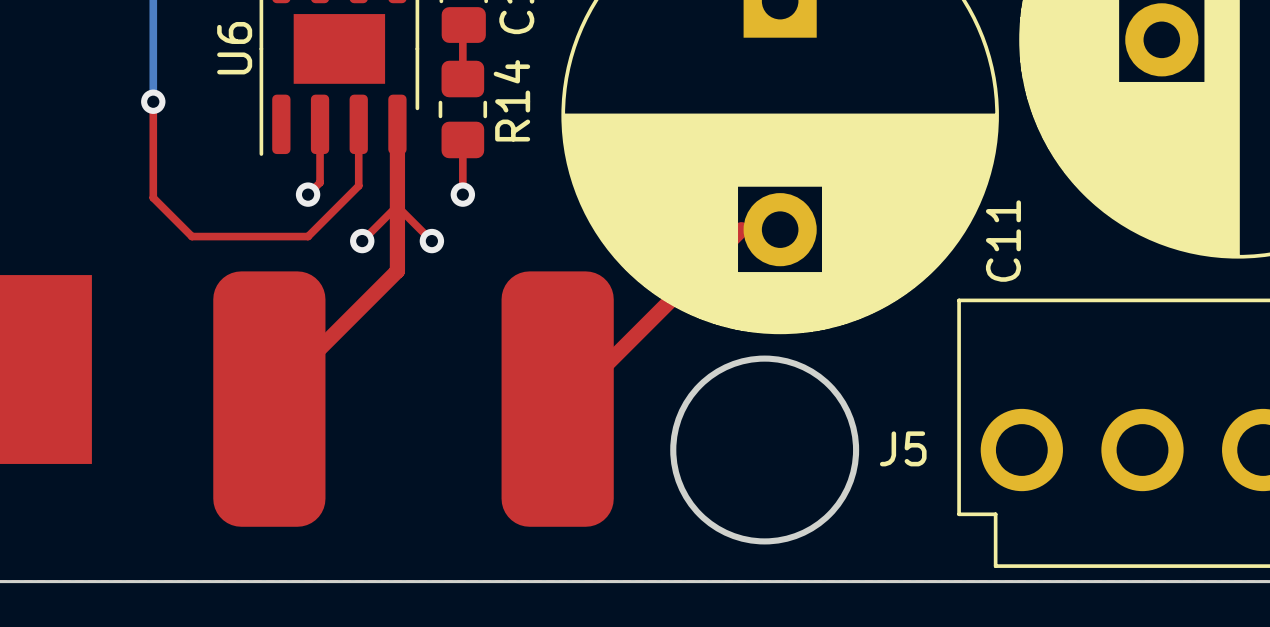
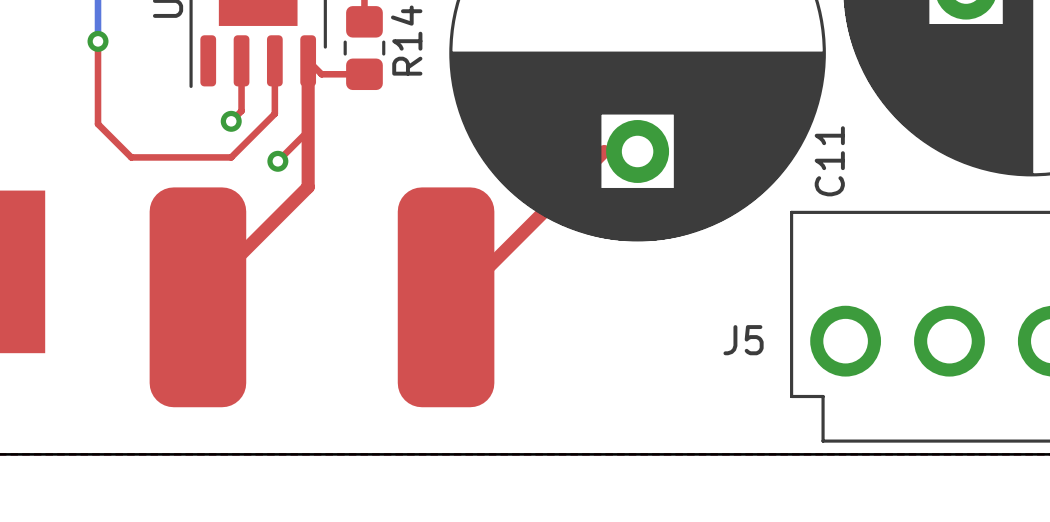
top track: (462, 139) (462, 194) -> (364, 74) (321, 74) (308, 60)
via: (462, 194) -> none
top track: (397, 205) (431, 241) -> none
via: (431, 241) -> none
round board edge: [670, 355, 860, 545] -> none

